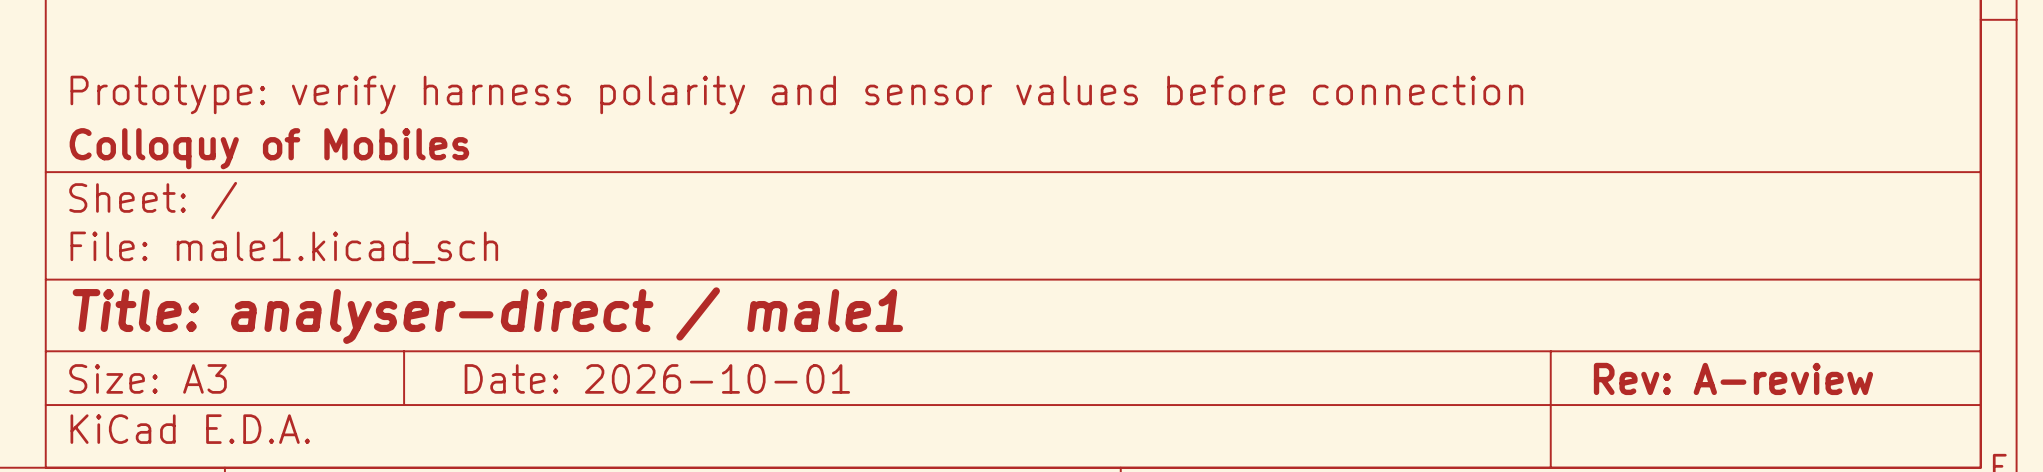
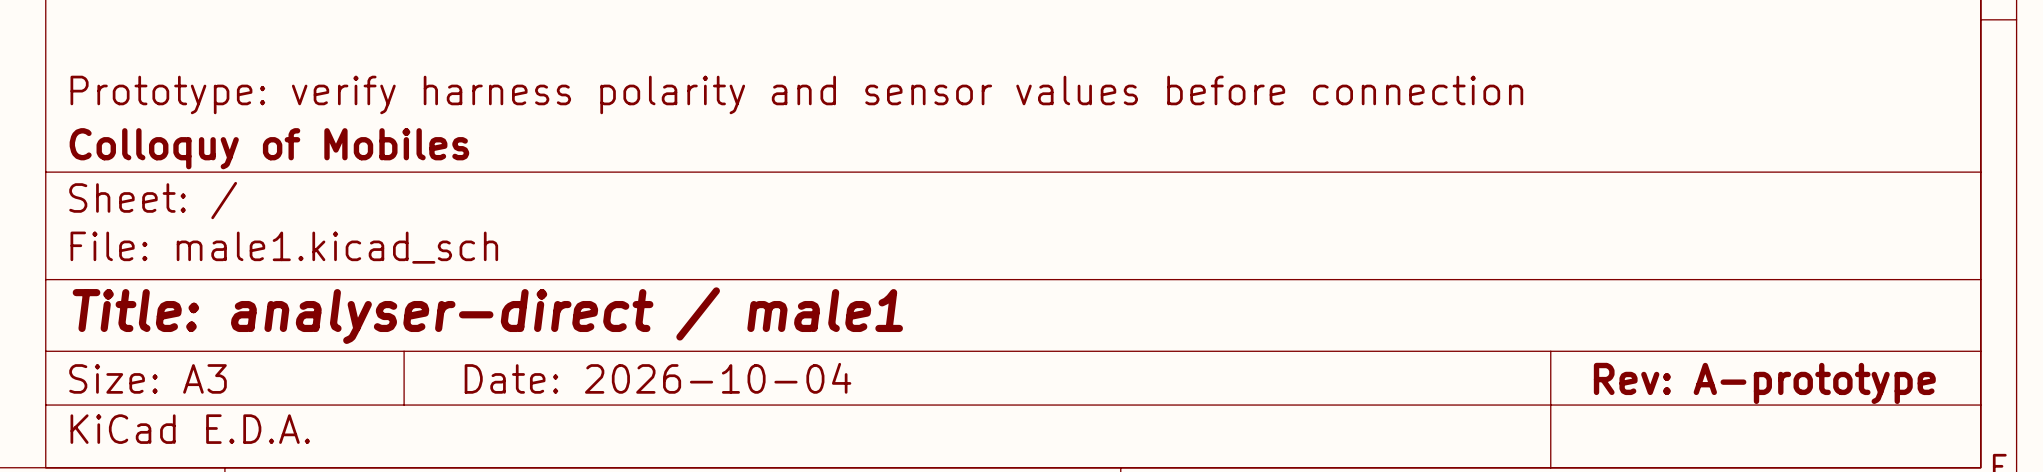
title block: Date: 2026-10-01 (657, 378) -> Date: 2026-10-04 (658, 378)
title block: Rev: A-review (1733, 378) -> Rev: A-prototype (1764, 383)

